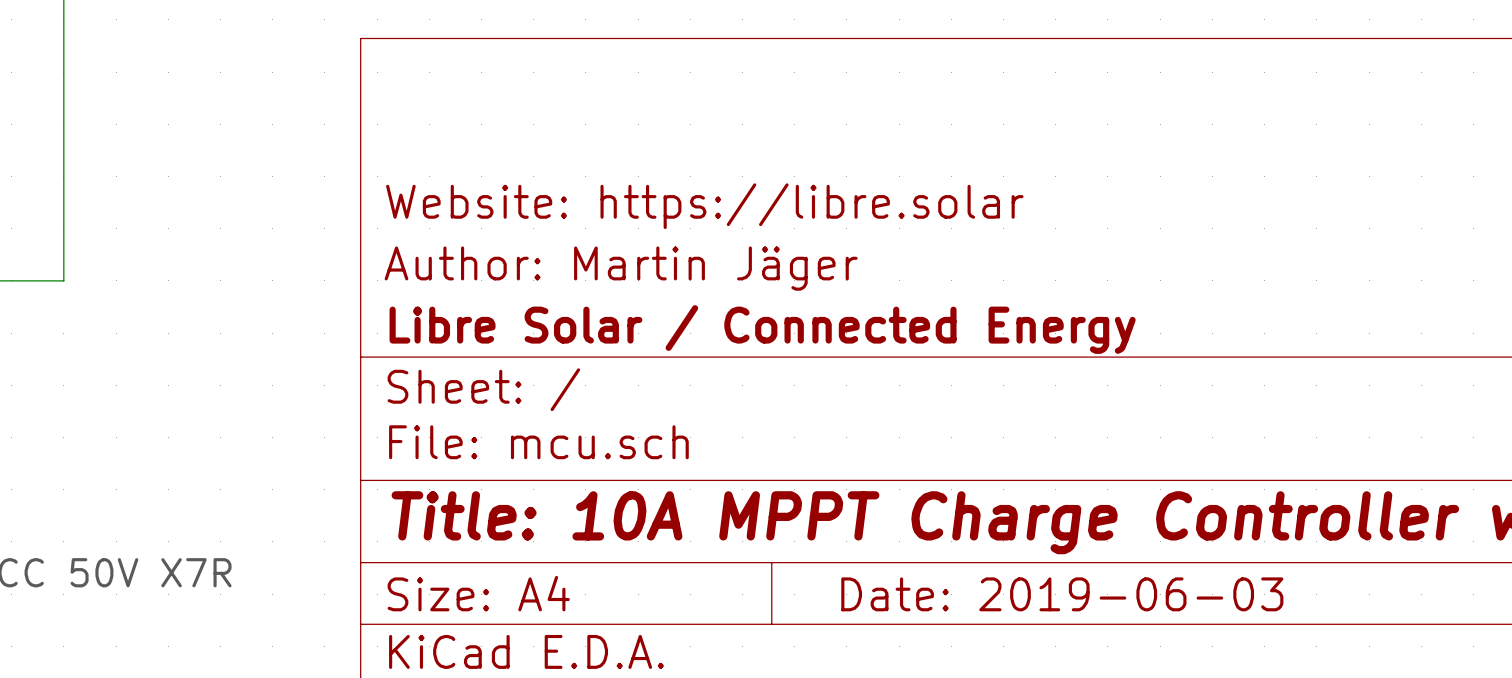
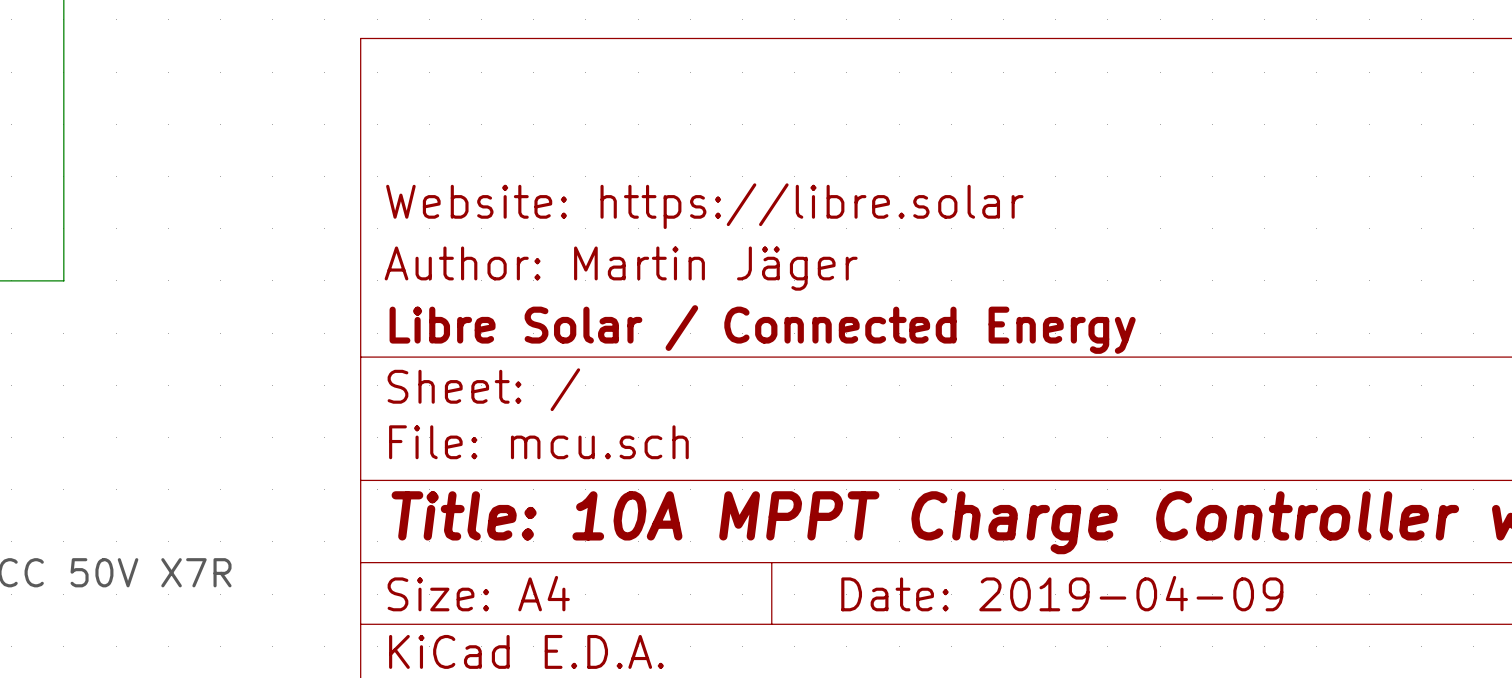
title block: Date: 2019-06-03 (1062, 594) -> Date: 2019-04-09 (1062, 593)

